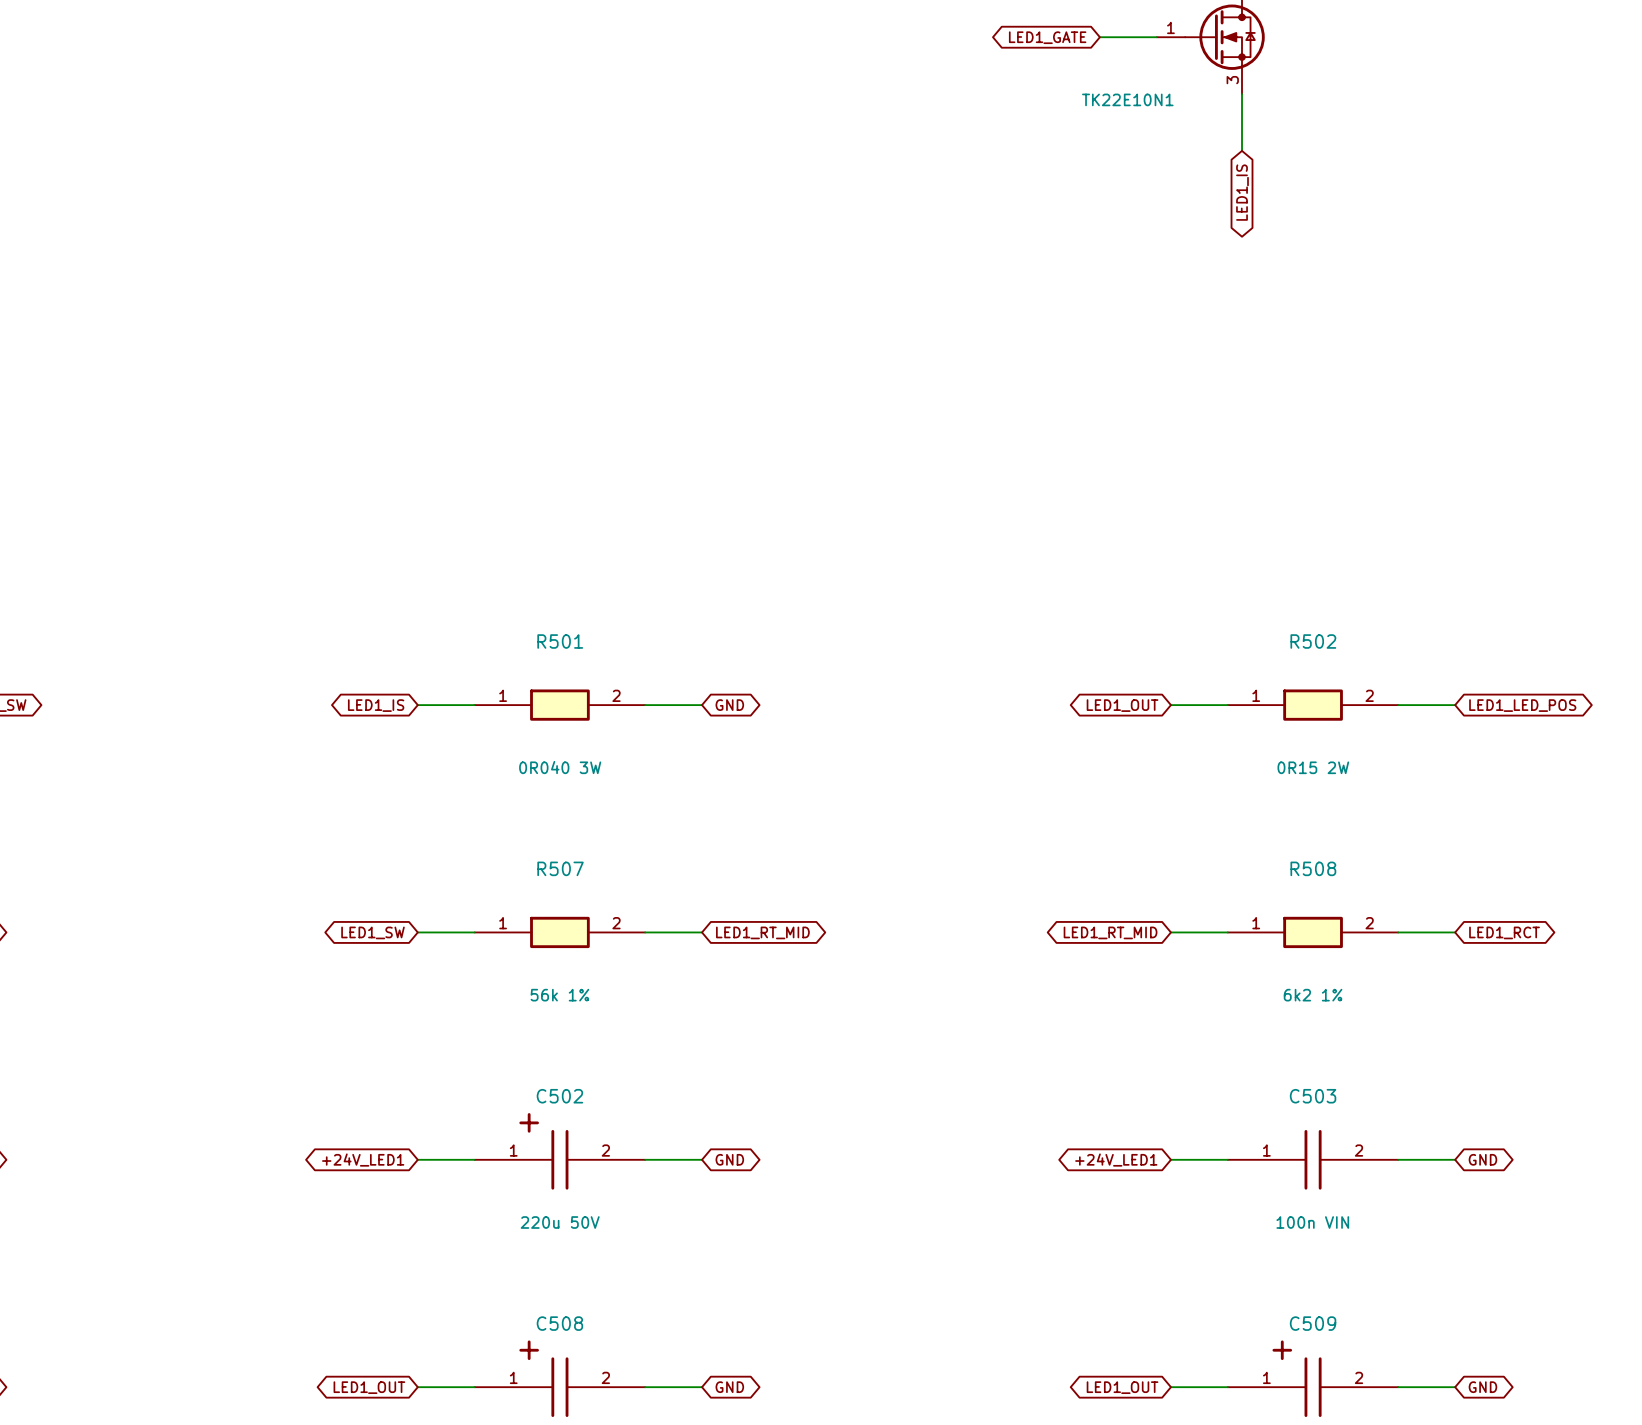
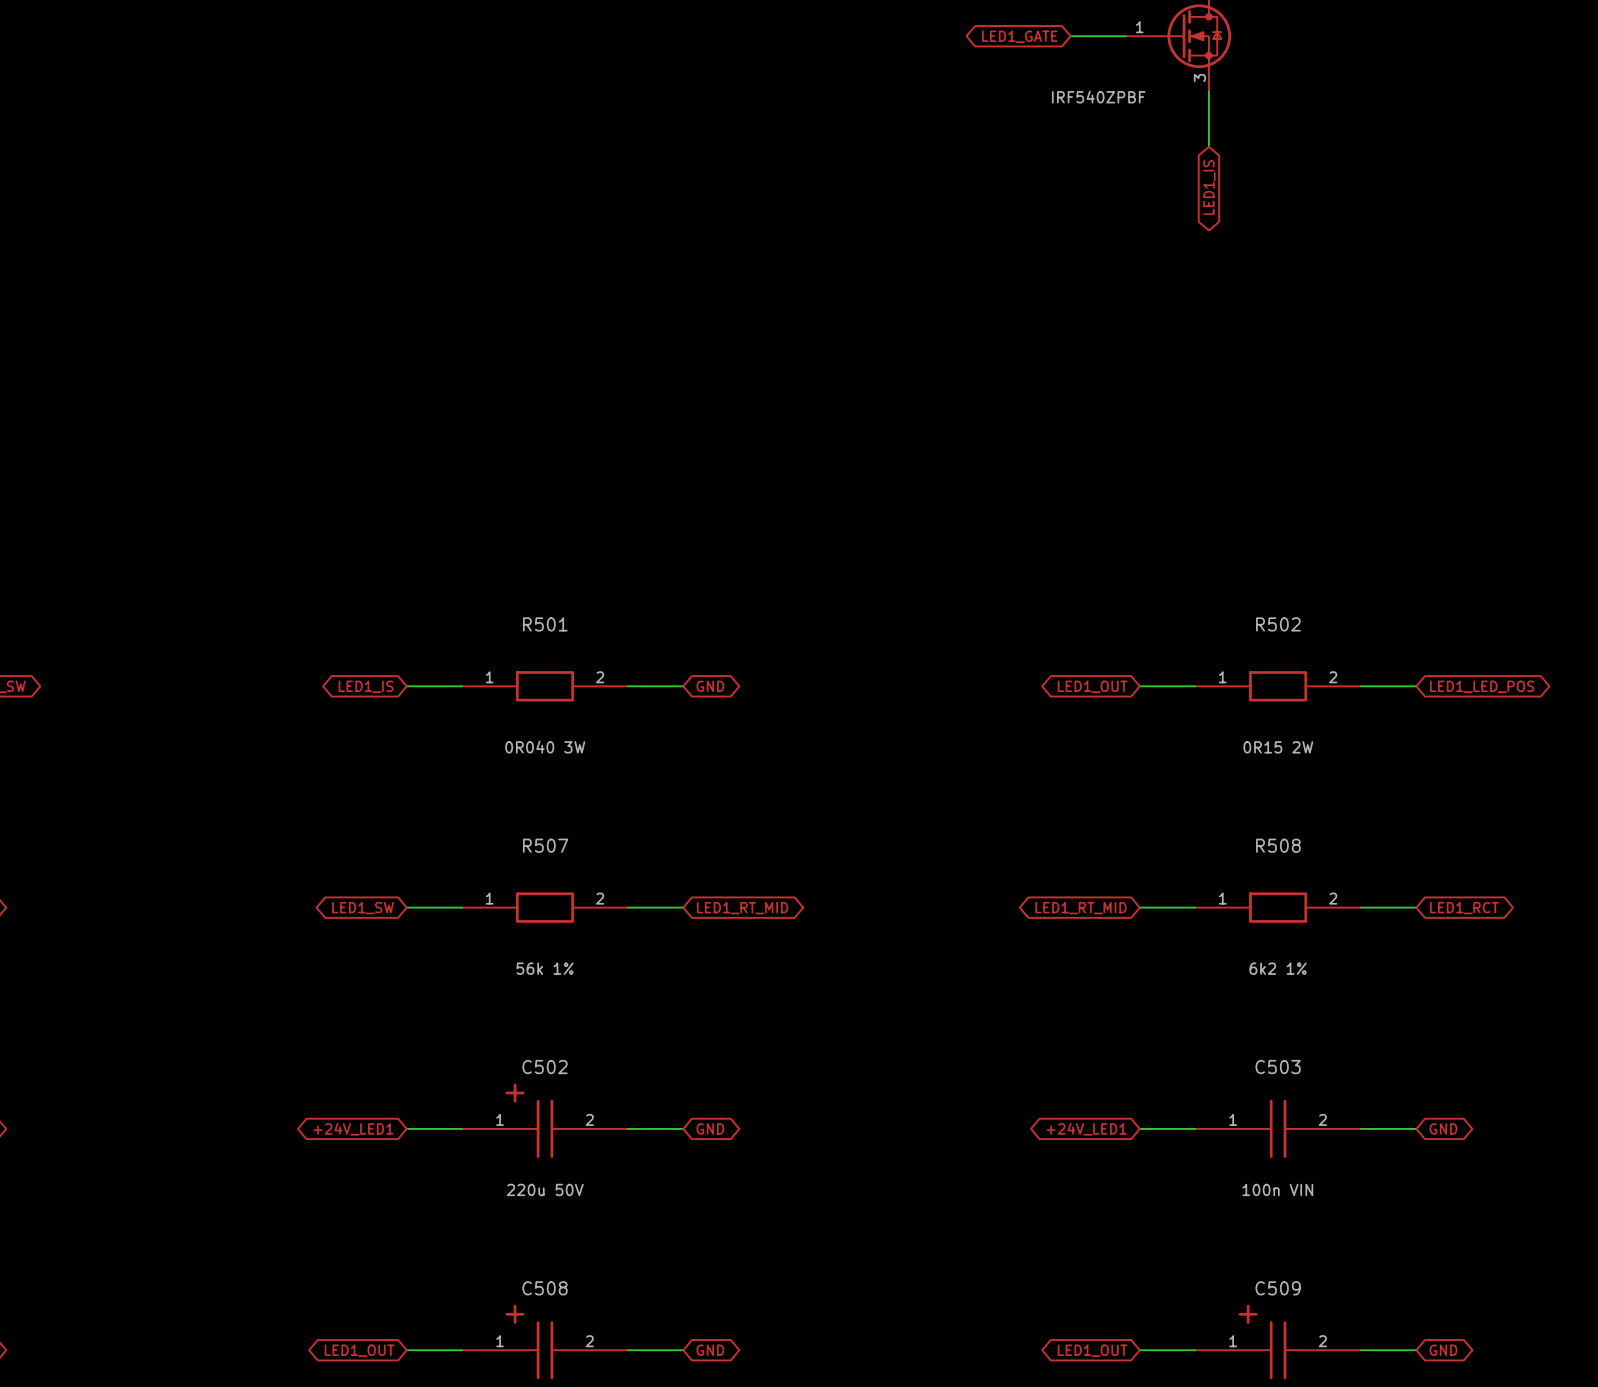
part value: TK22E10N1 (1127, 99) -> IRF540ZPBF (1098, 97)

